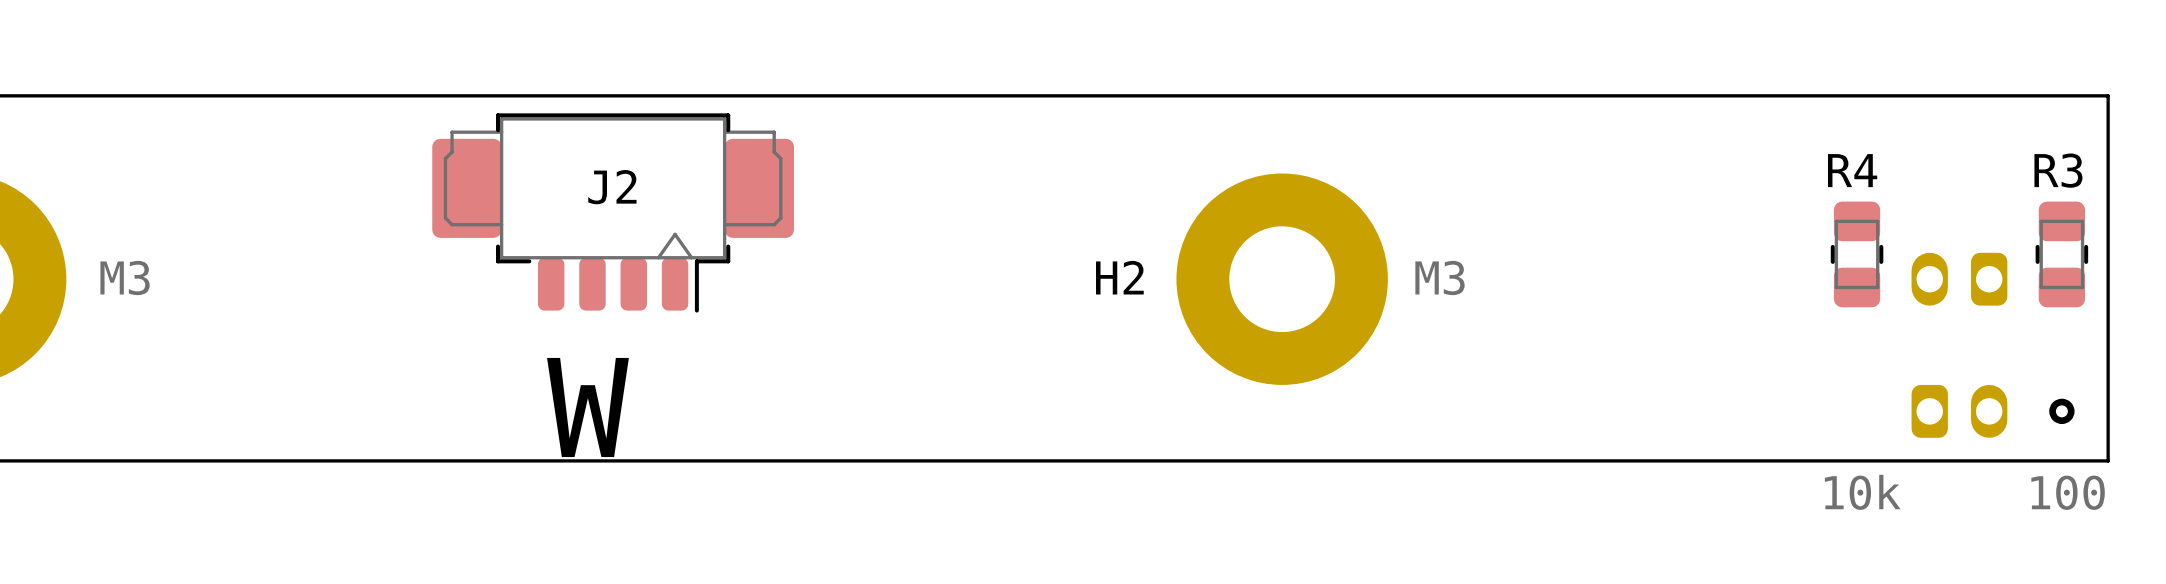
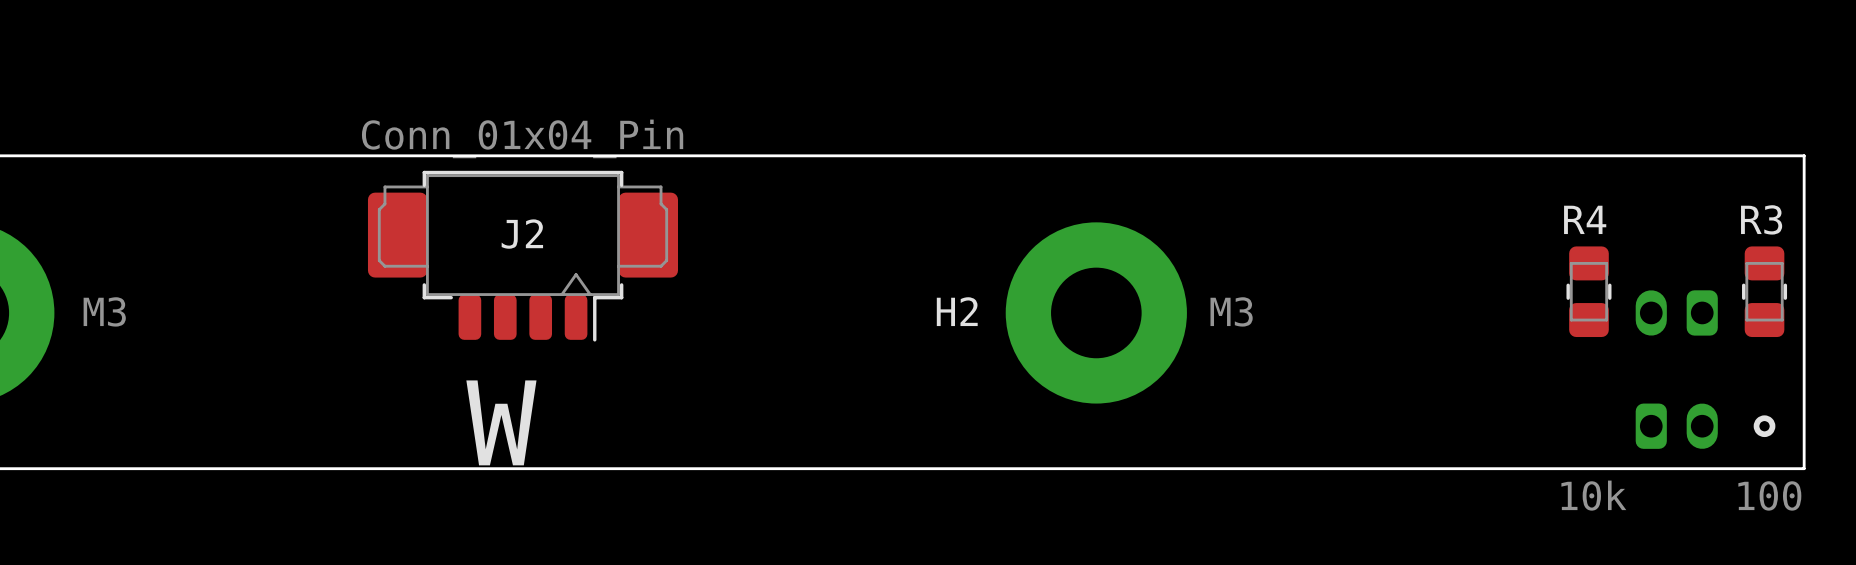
J2 value: none -> Conn_01x04_Pin (522, 138)

